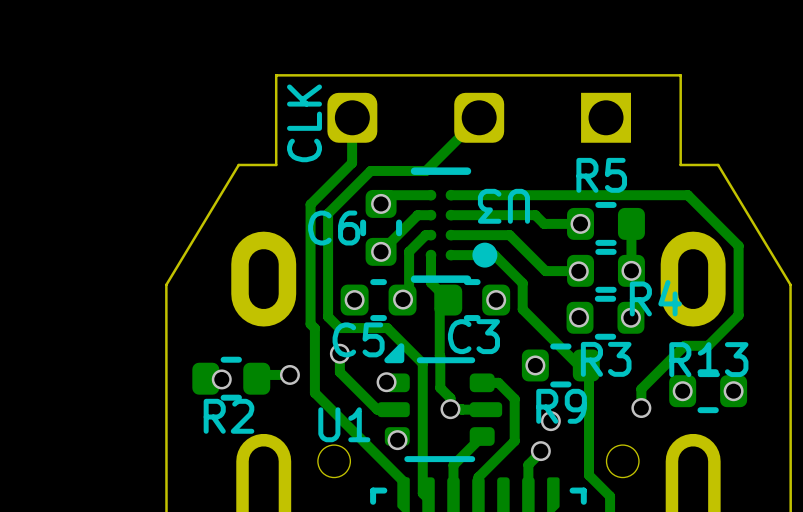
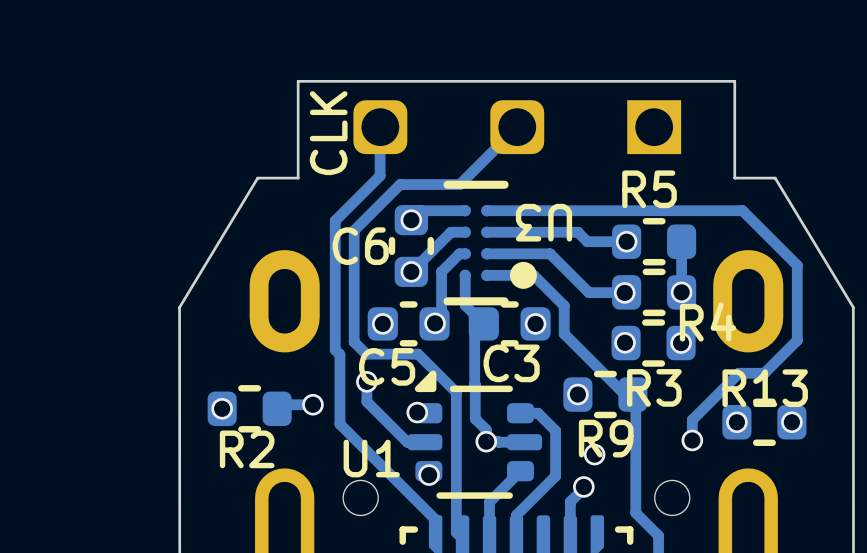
via position: (221, 379) -> (222, 408)

